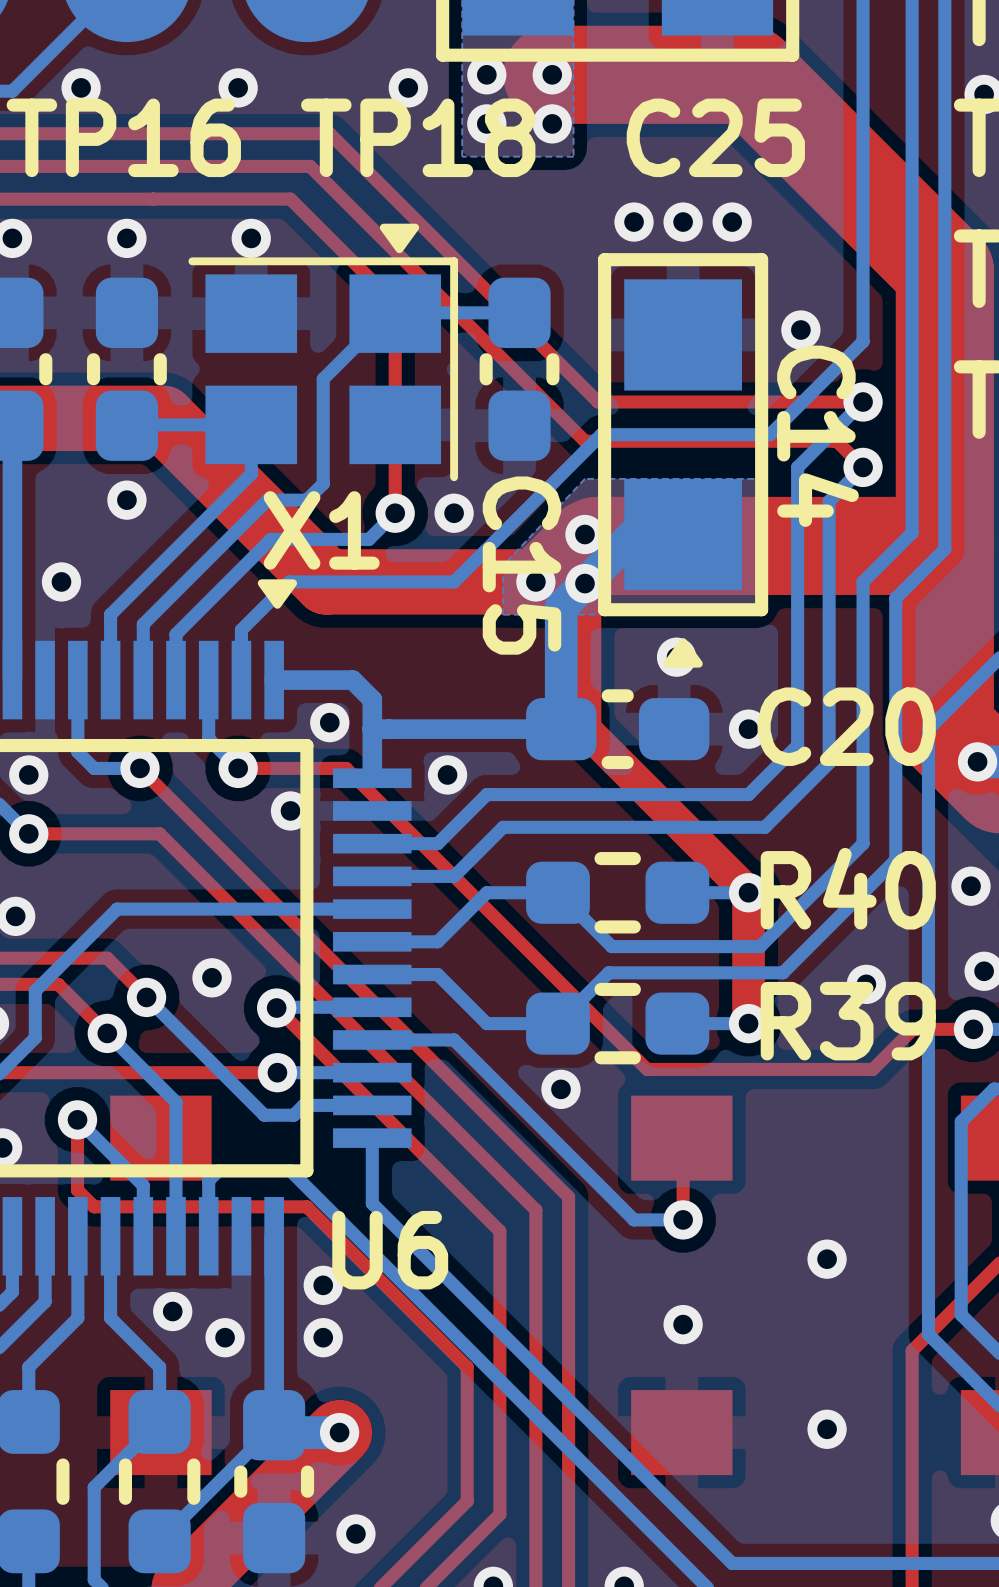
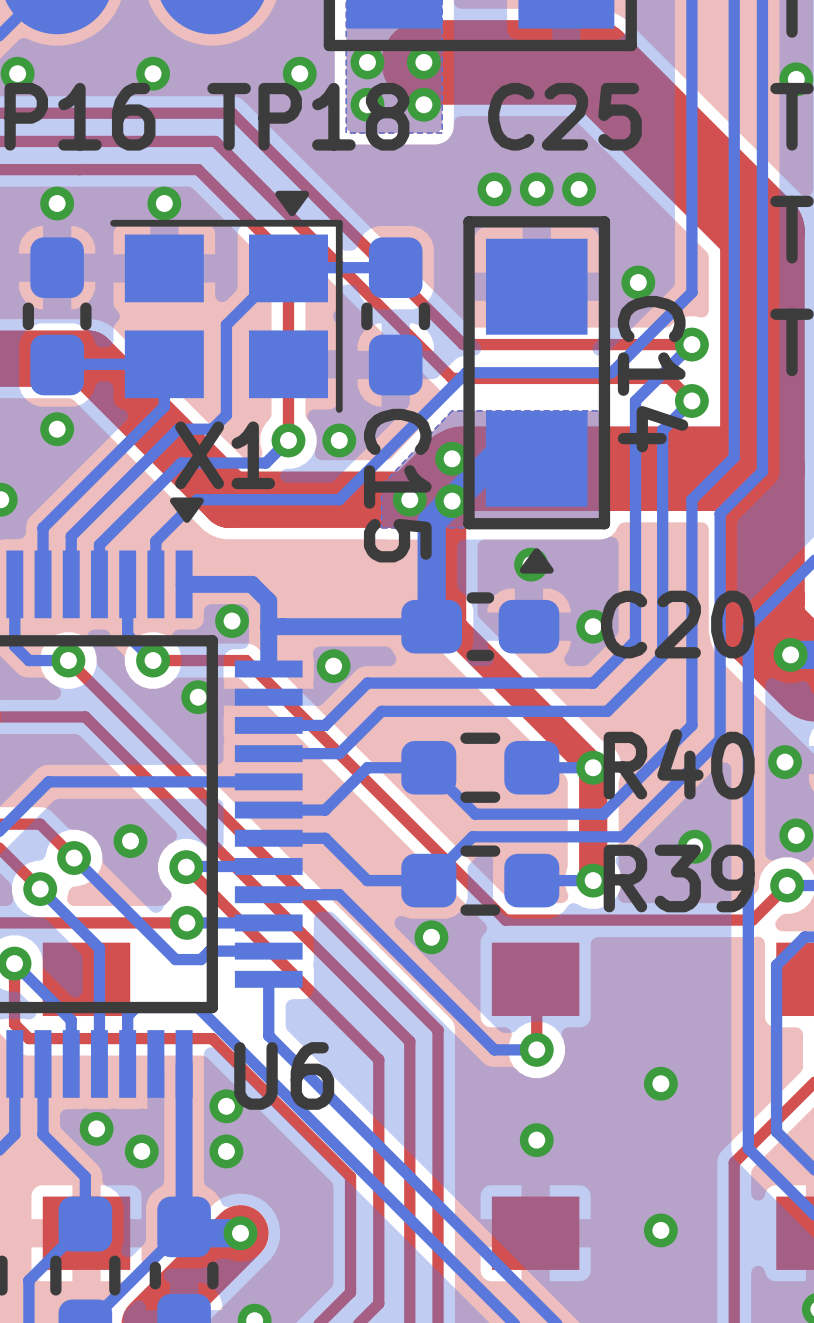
top track: (973, 1029) (912, 1029) (872, 1069) -> (787, 885) (752, 920) (700, 920)

